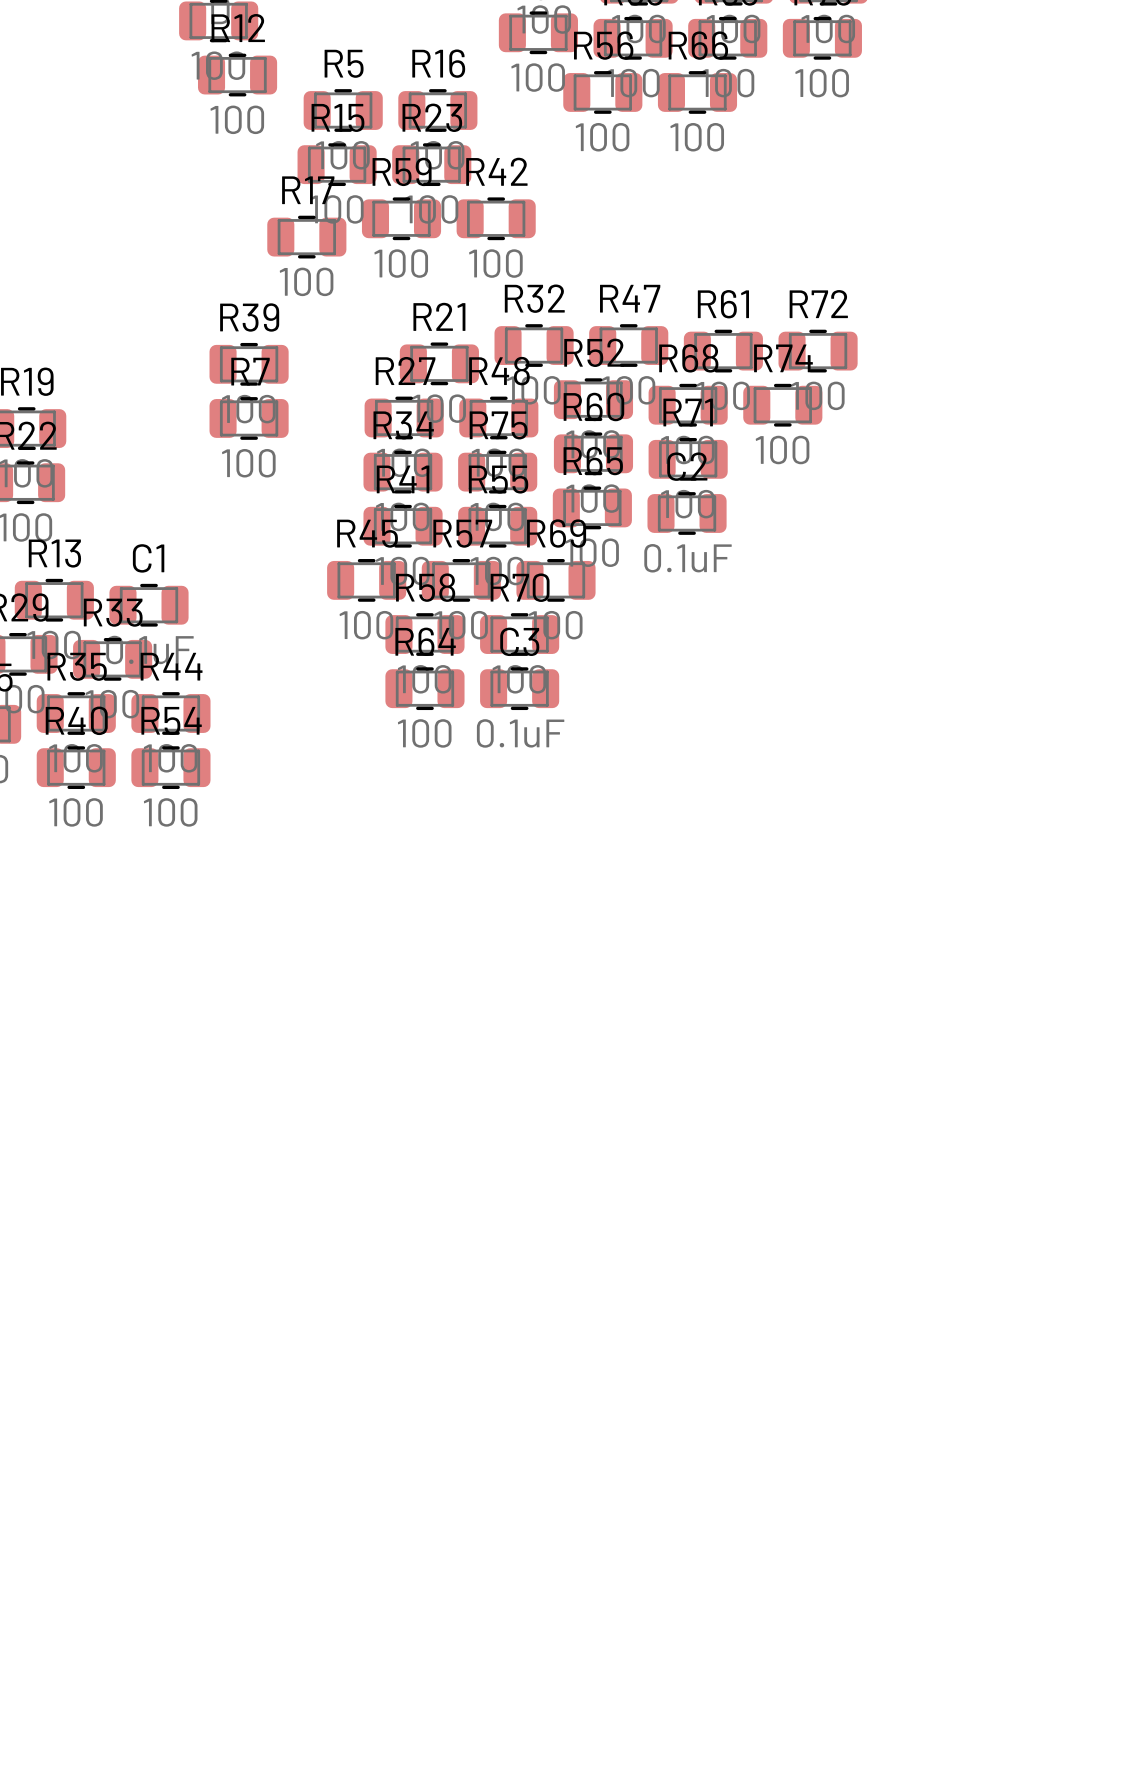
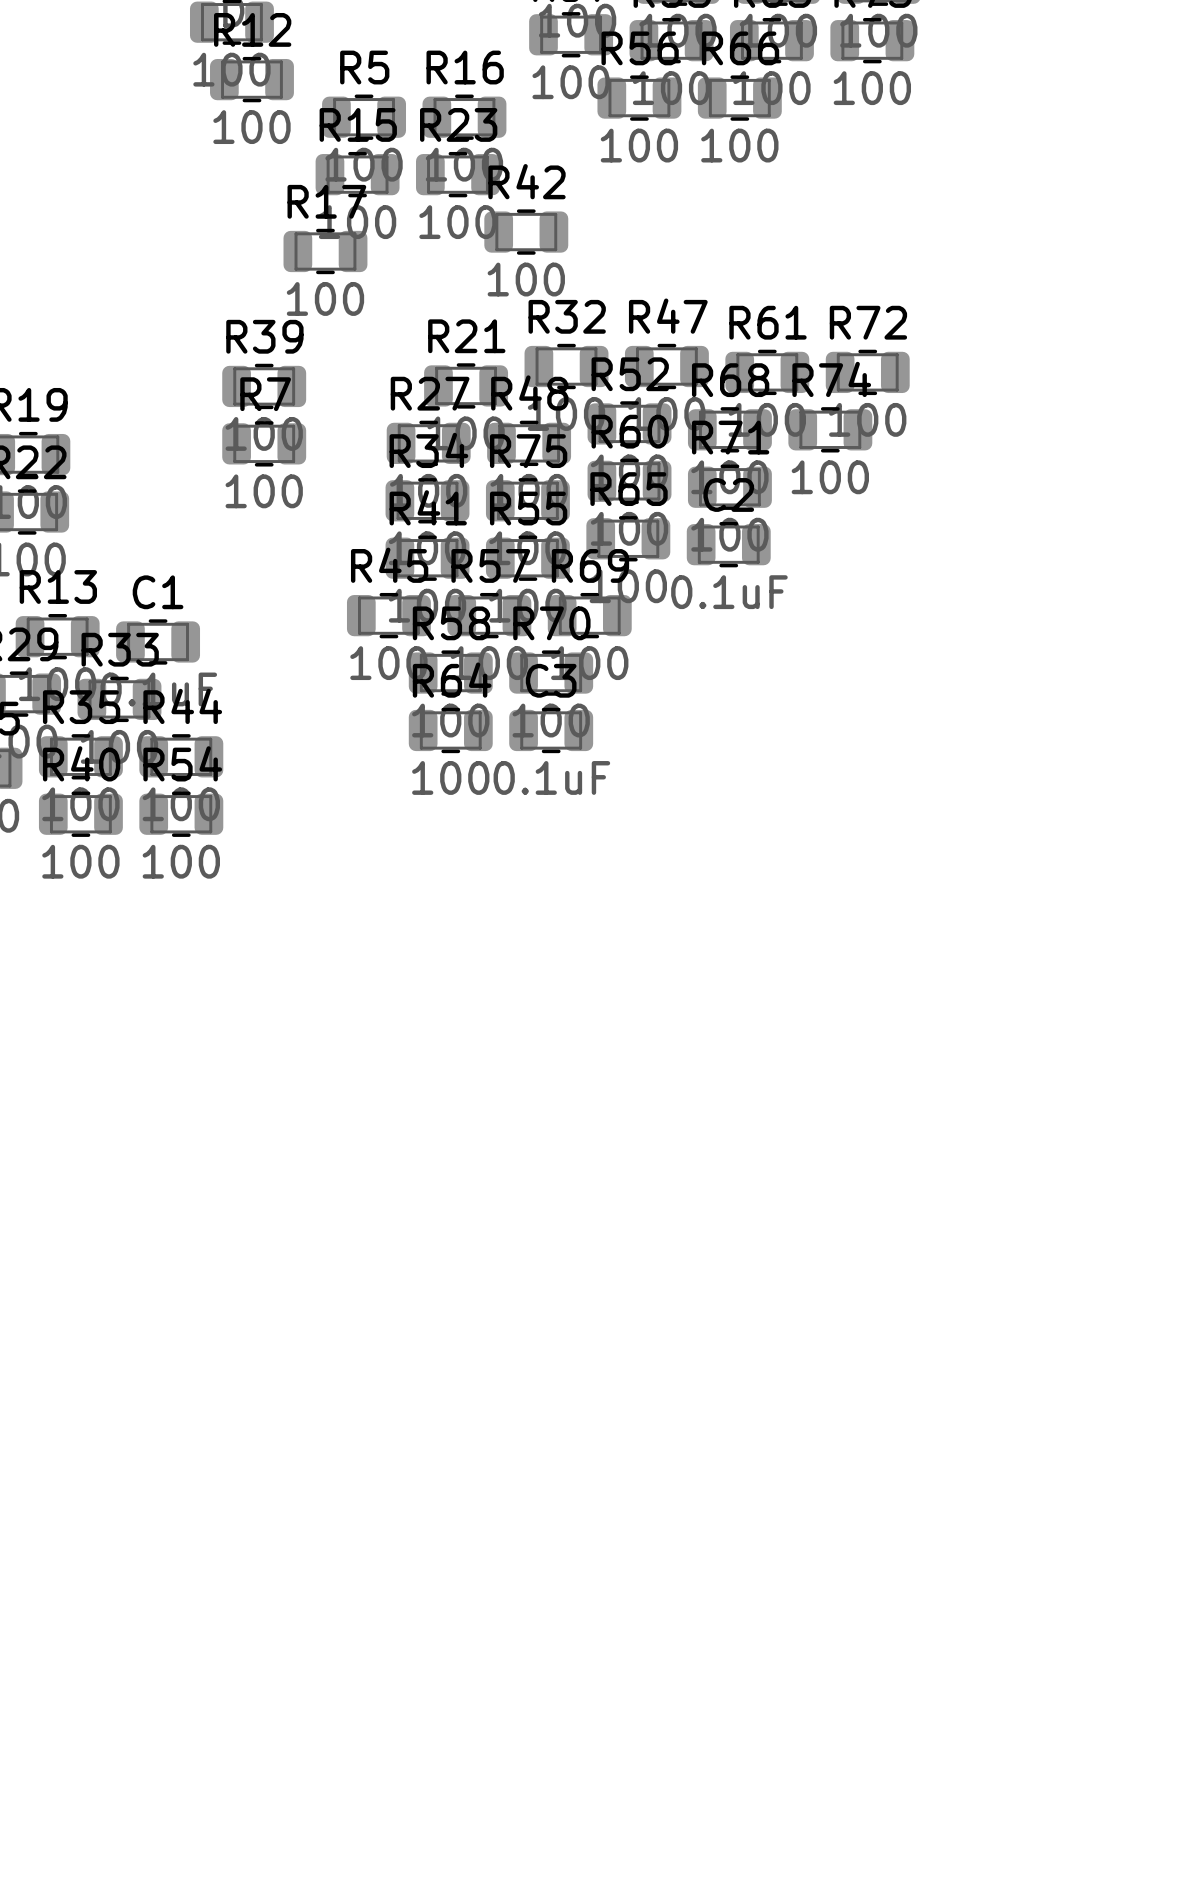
R59: 100 (401, 218) -> none

